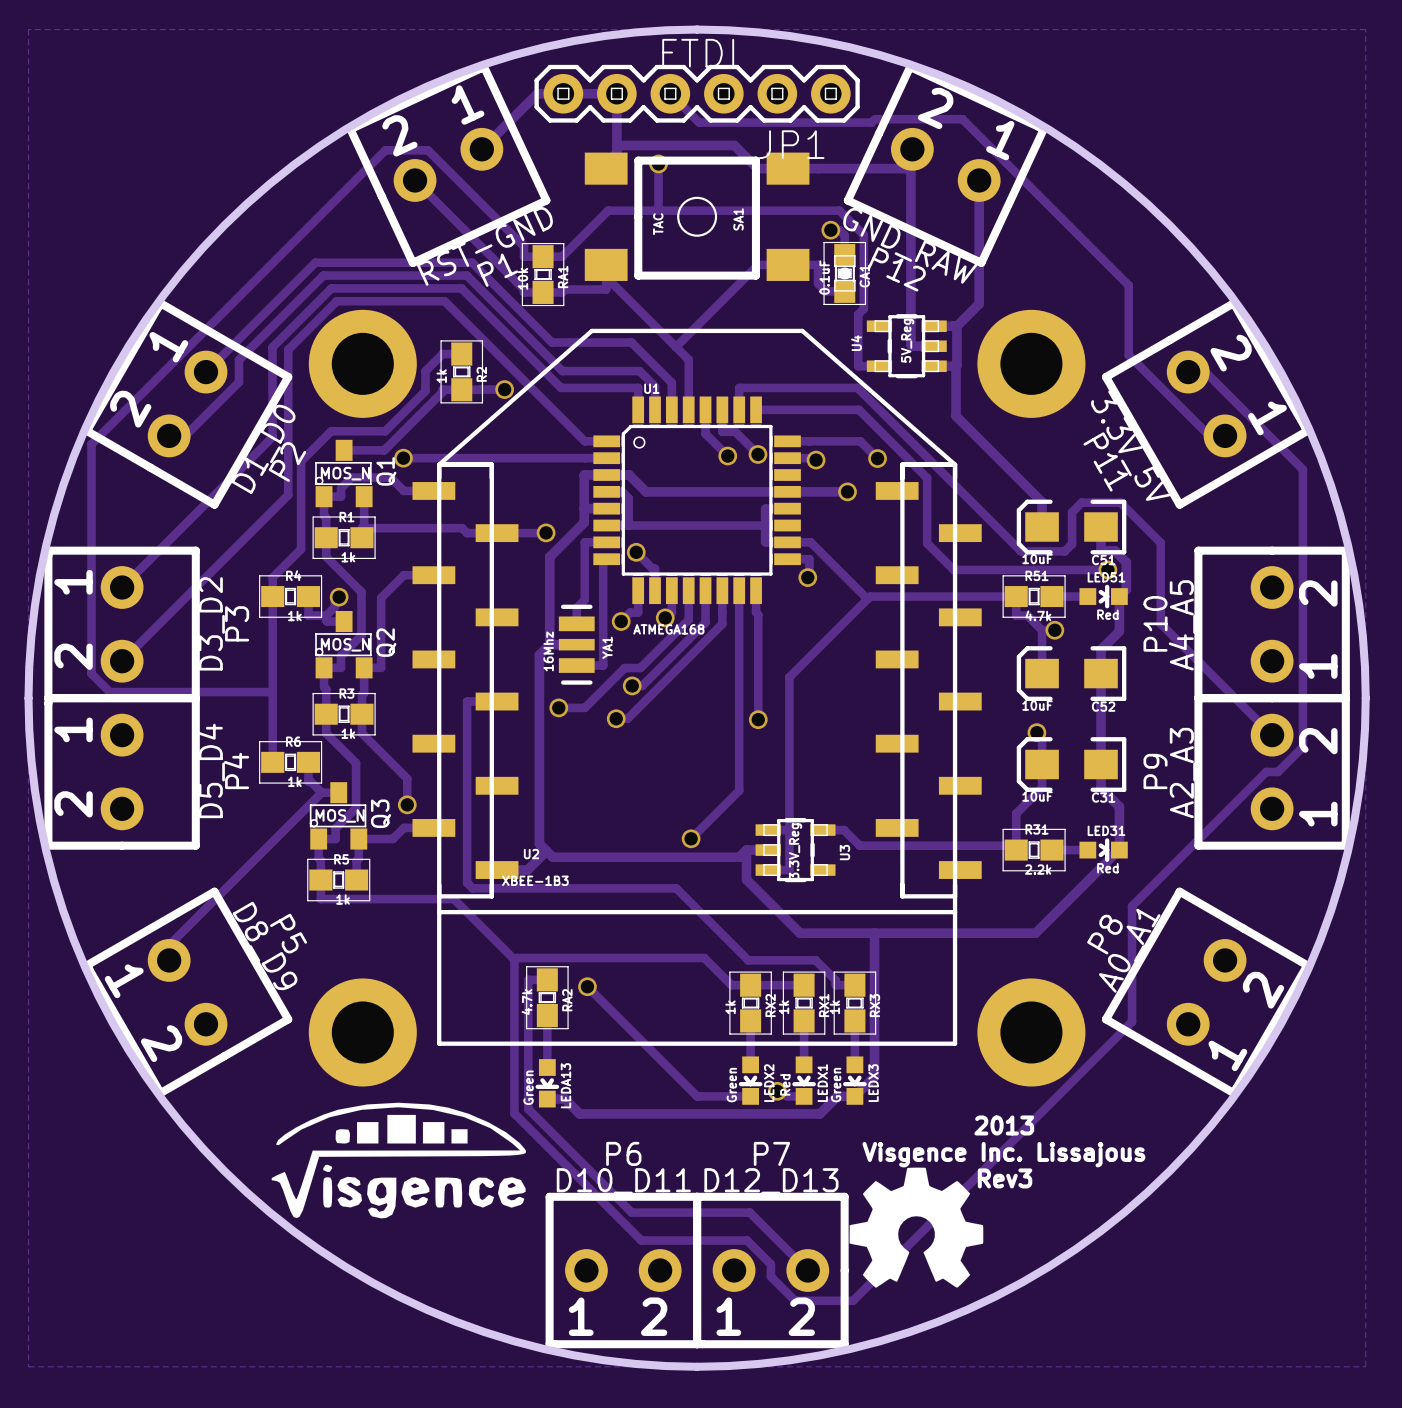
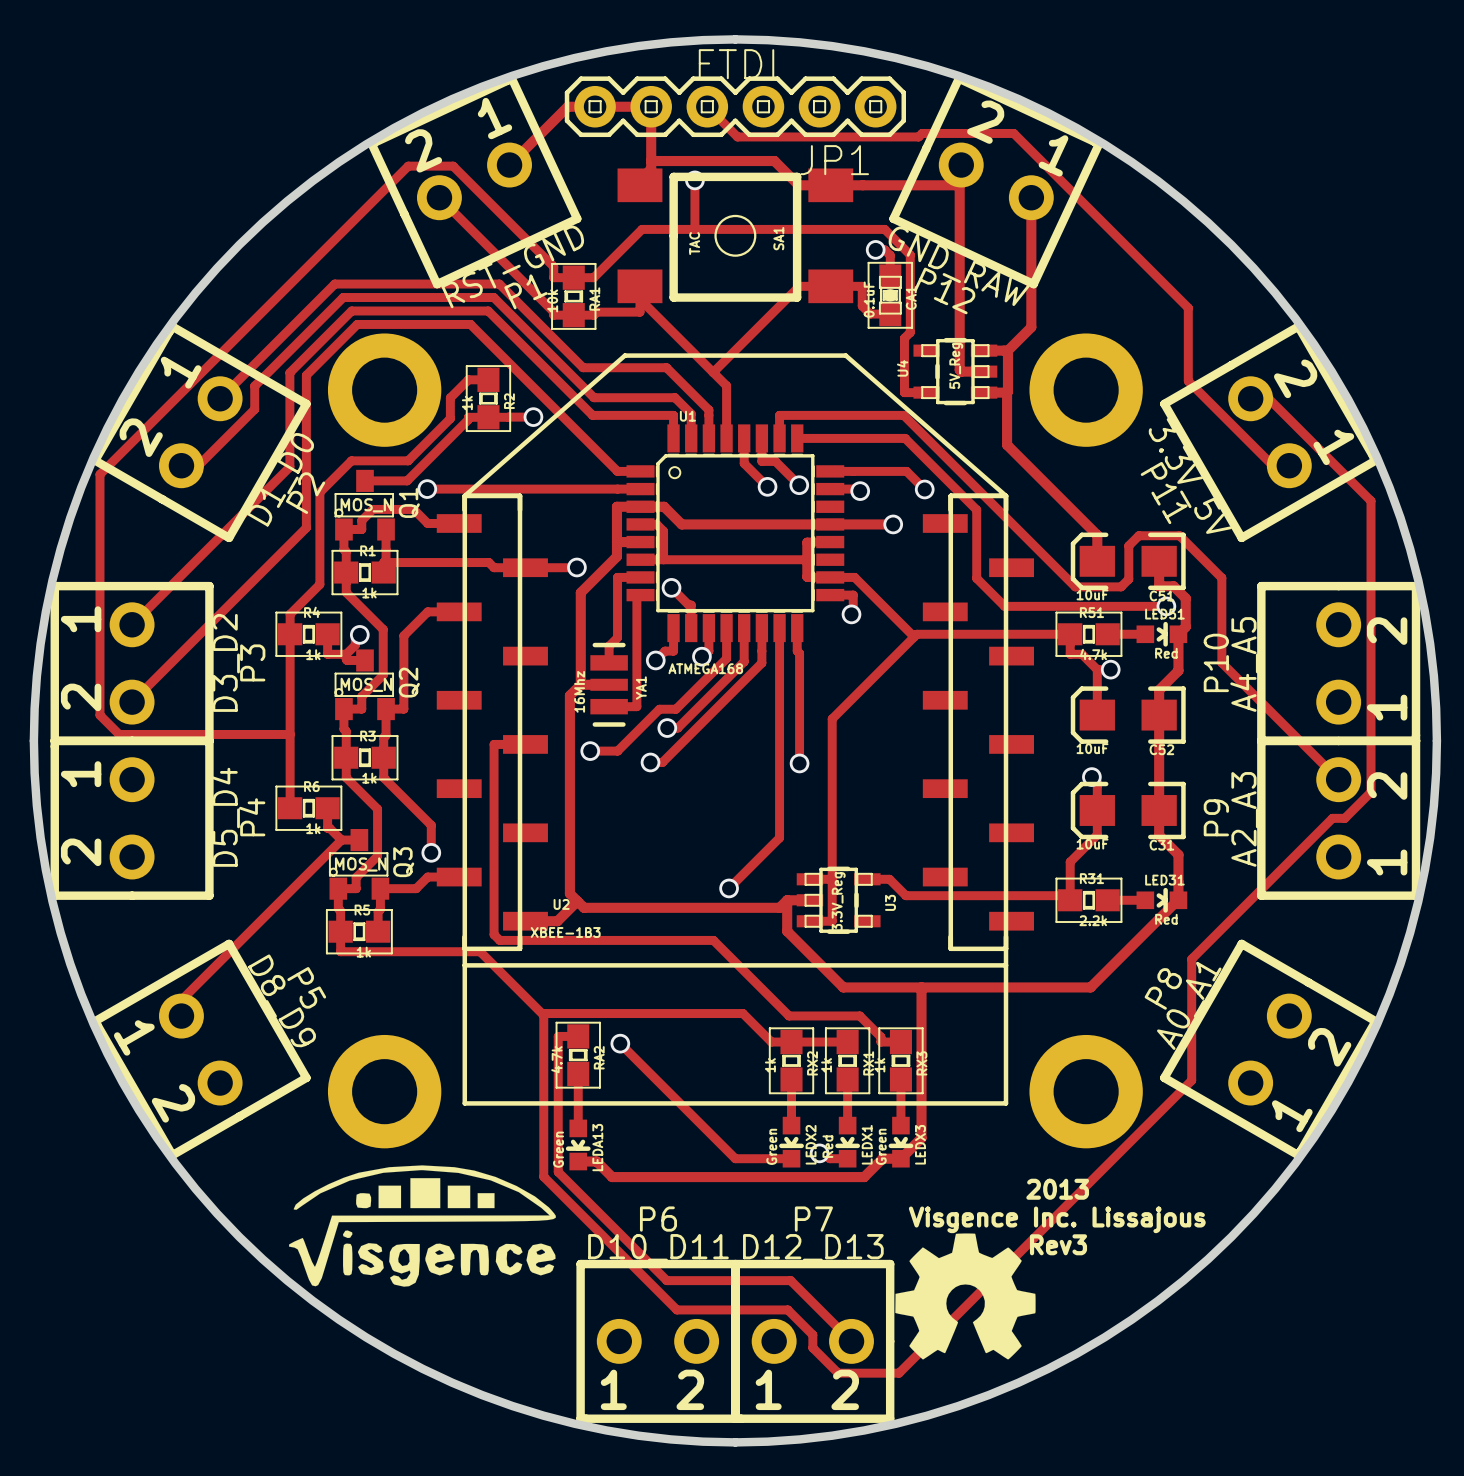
zone outline: (28, 29) (1365, 29) (1365, 1366) (28, 1366) (28, 29) -> none

